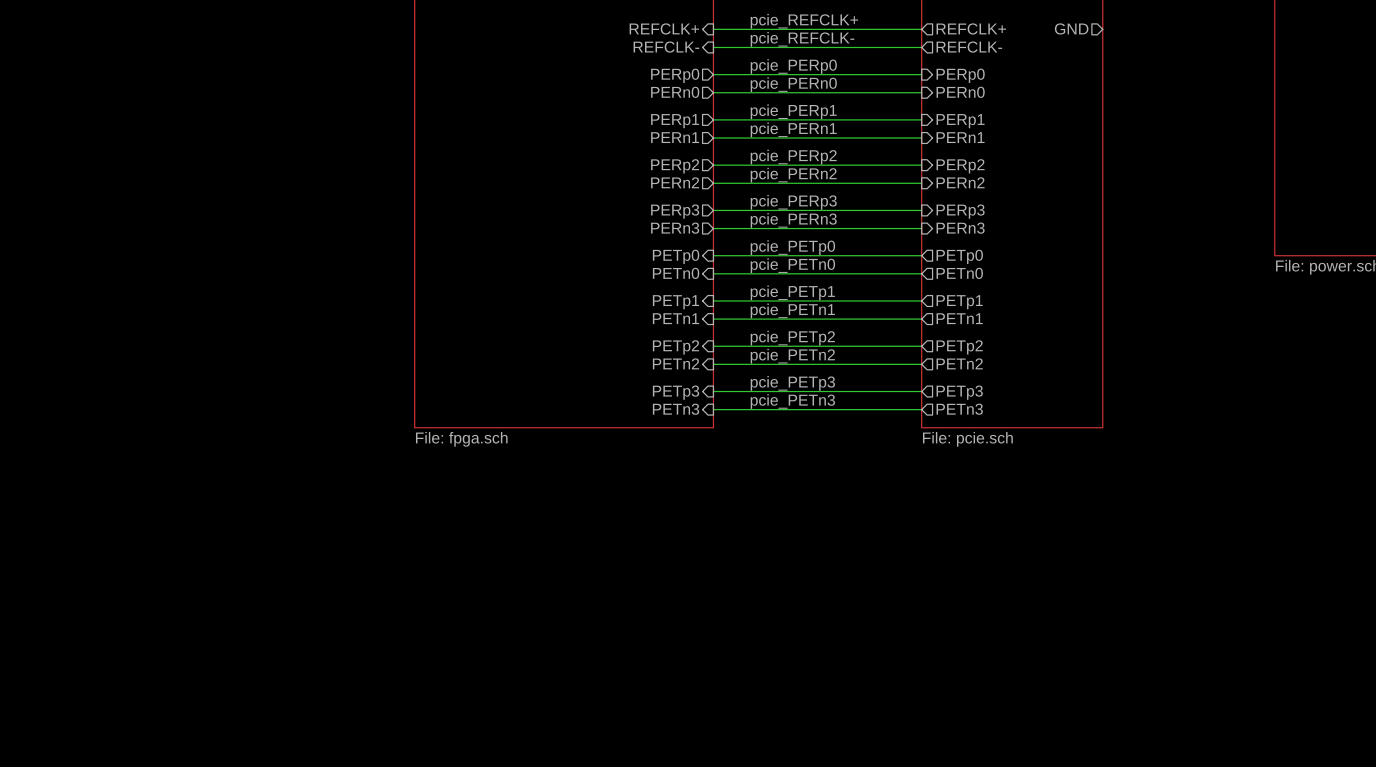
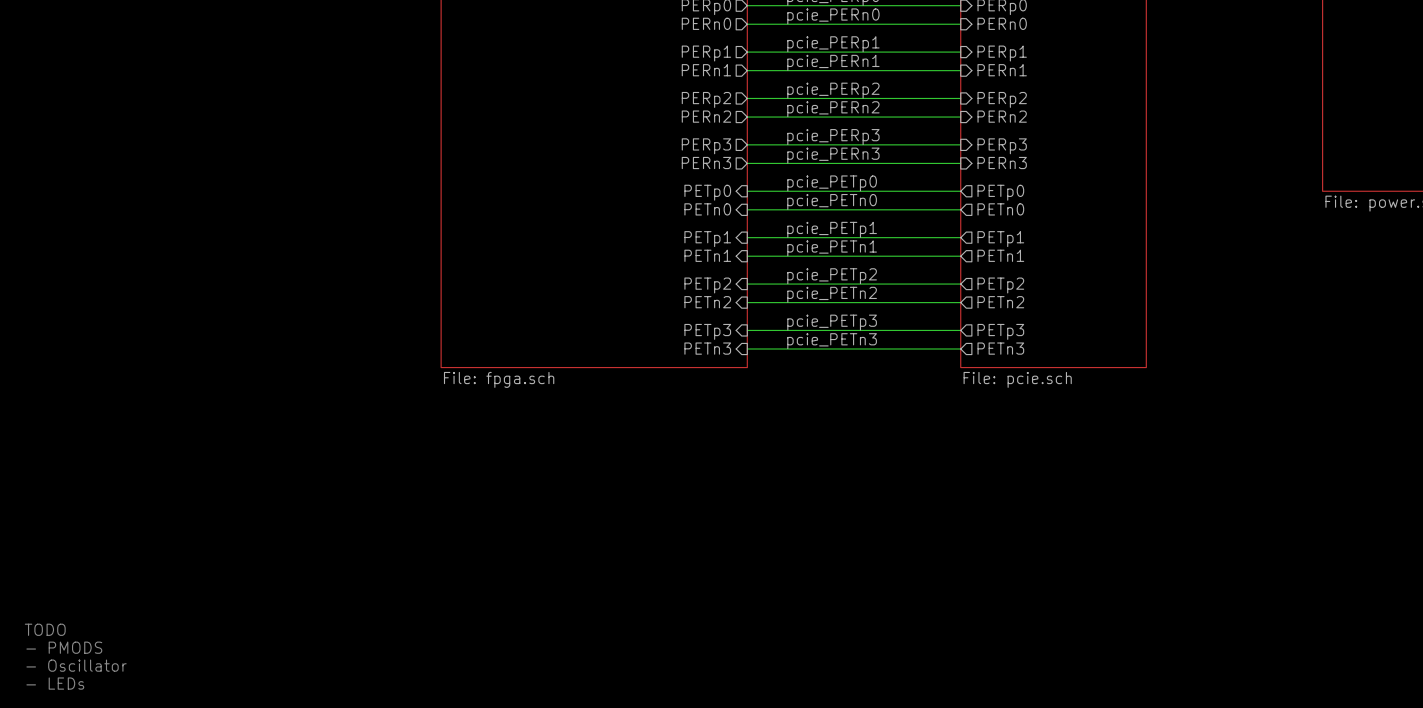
text: none -> TODO (45, 629)
text: none -> - PMODS (64, 647)
text: none -> - Oscillator (76, 665)
text: none -> - LEDs (55, 683)

